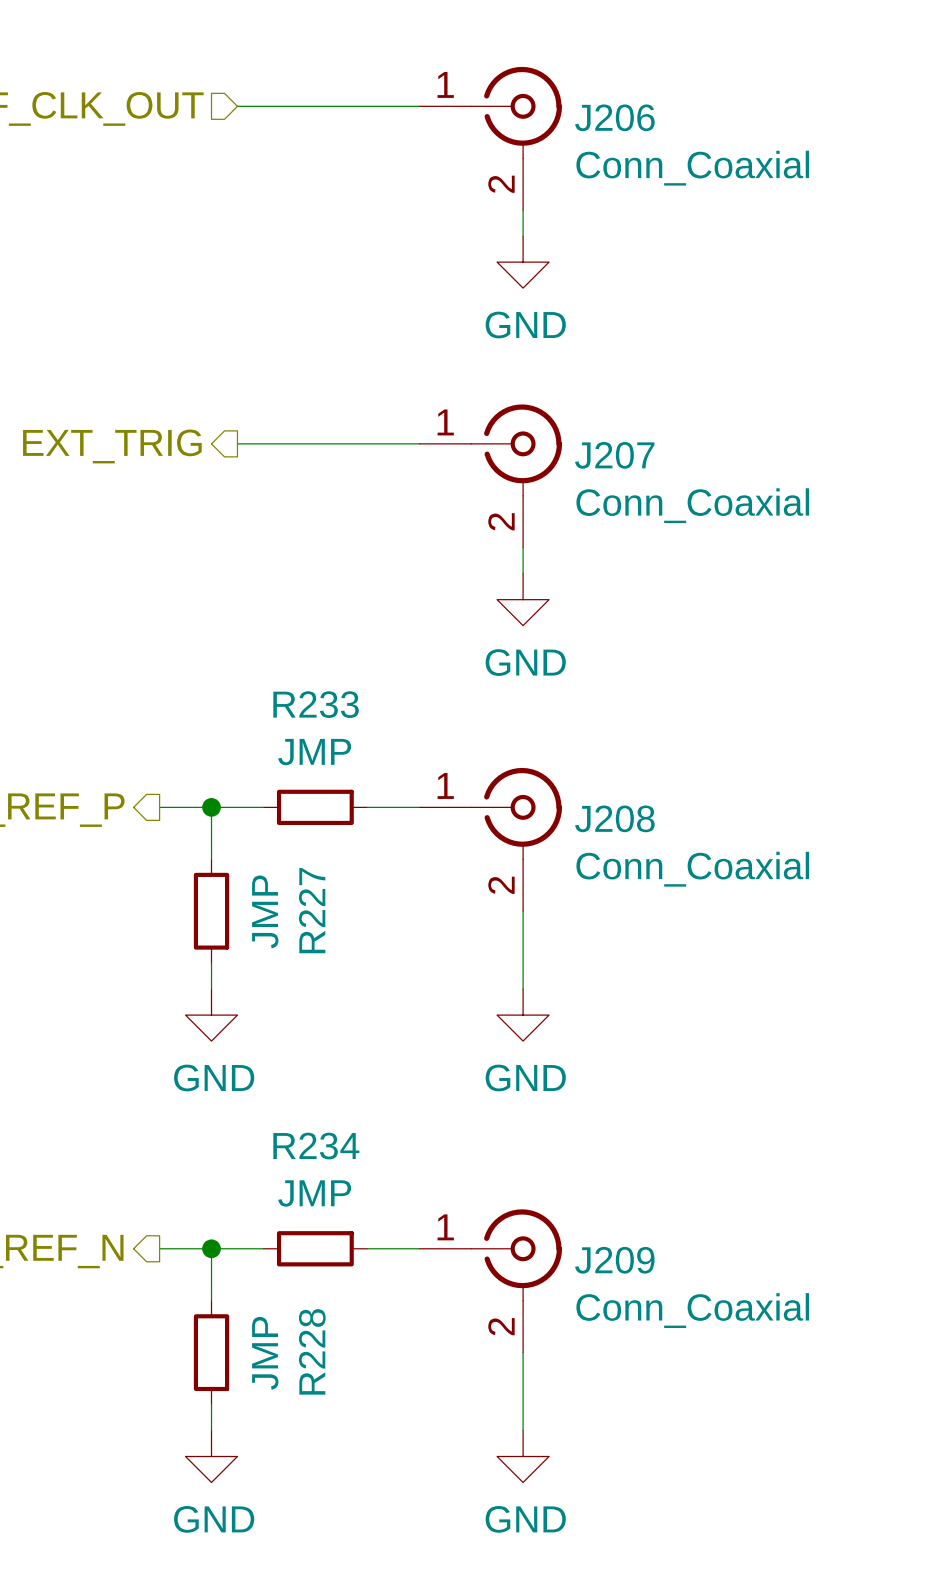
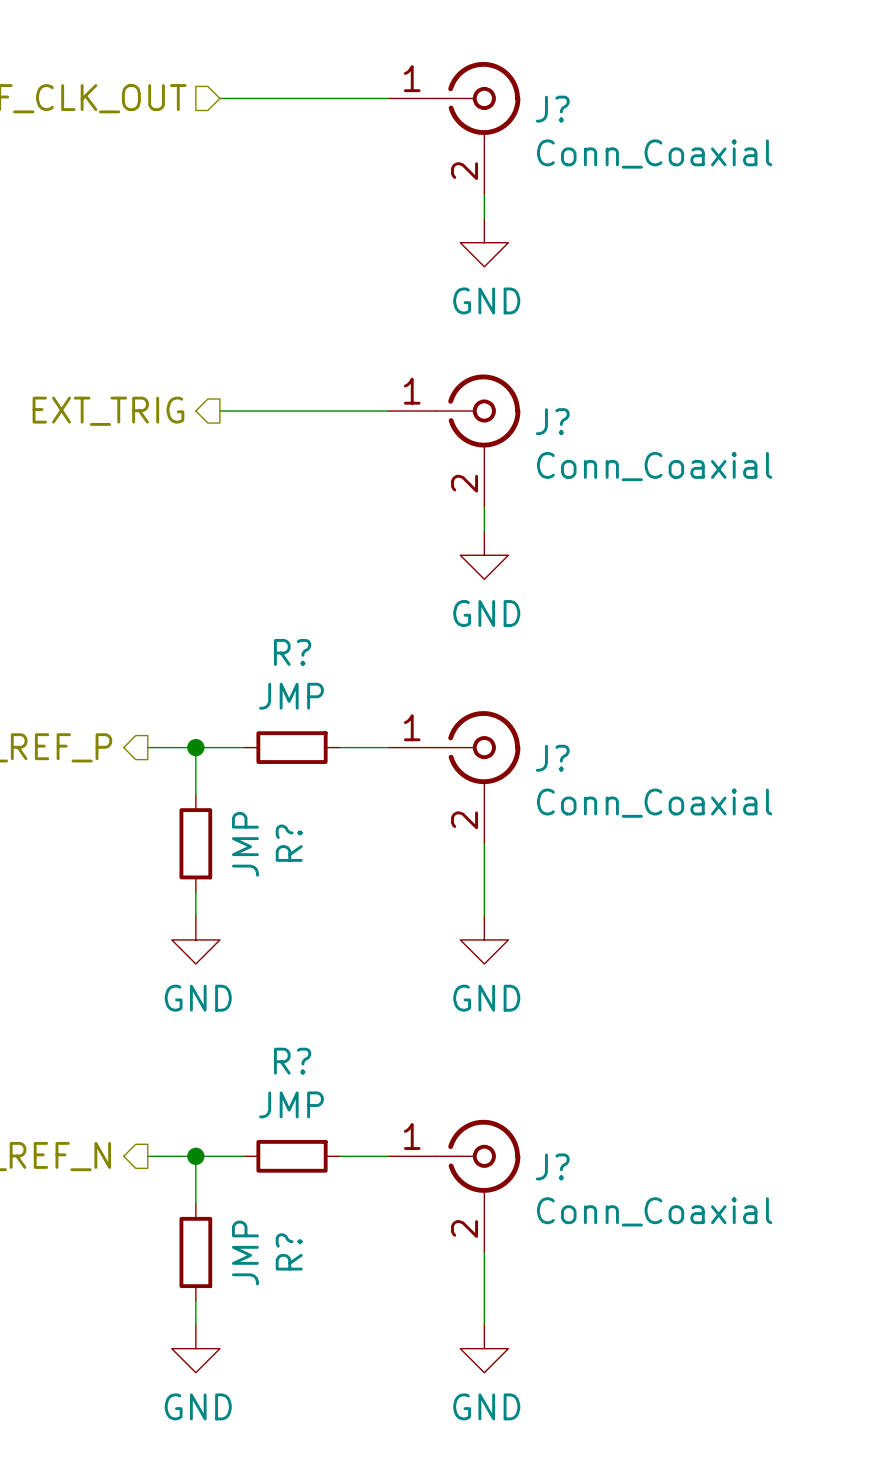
J206 name: J206 (614, 117) -> J? (552, 109)
J207 name: J207 (614, 455) -> J? (552, 421)
R233 name: R233 (316, 704) -> R? (292, 652)
J208 name: J208 (614, 818) -> J? (552, 758)
R227 name: R227 (312, 910) -> R? (289, 843)
R234 name: R234 (316, 1146) -> R? (292, 1061)
J209 name: J209 (614, 1260) -> J? (552, 1166)
R228 name: R228 (312, 1351) -> R? (289, 1251)

